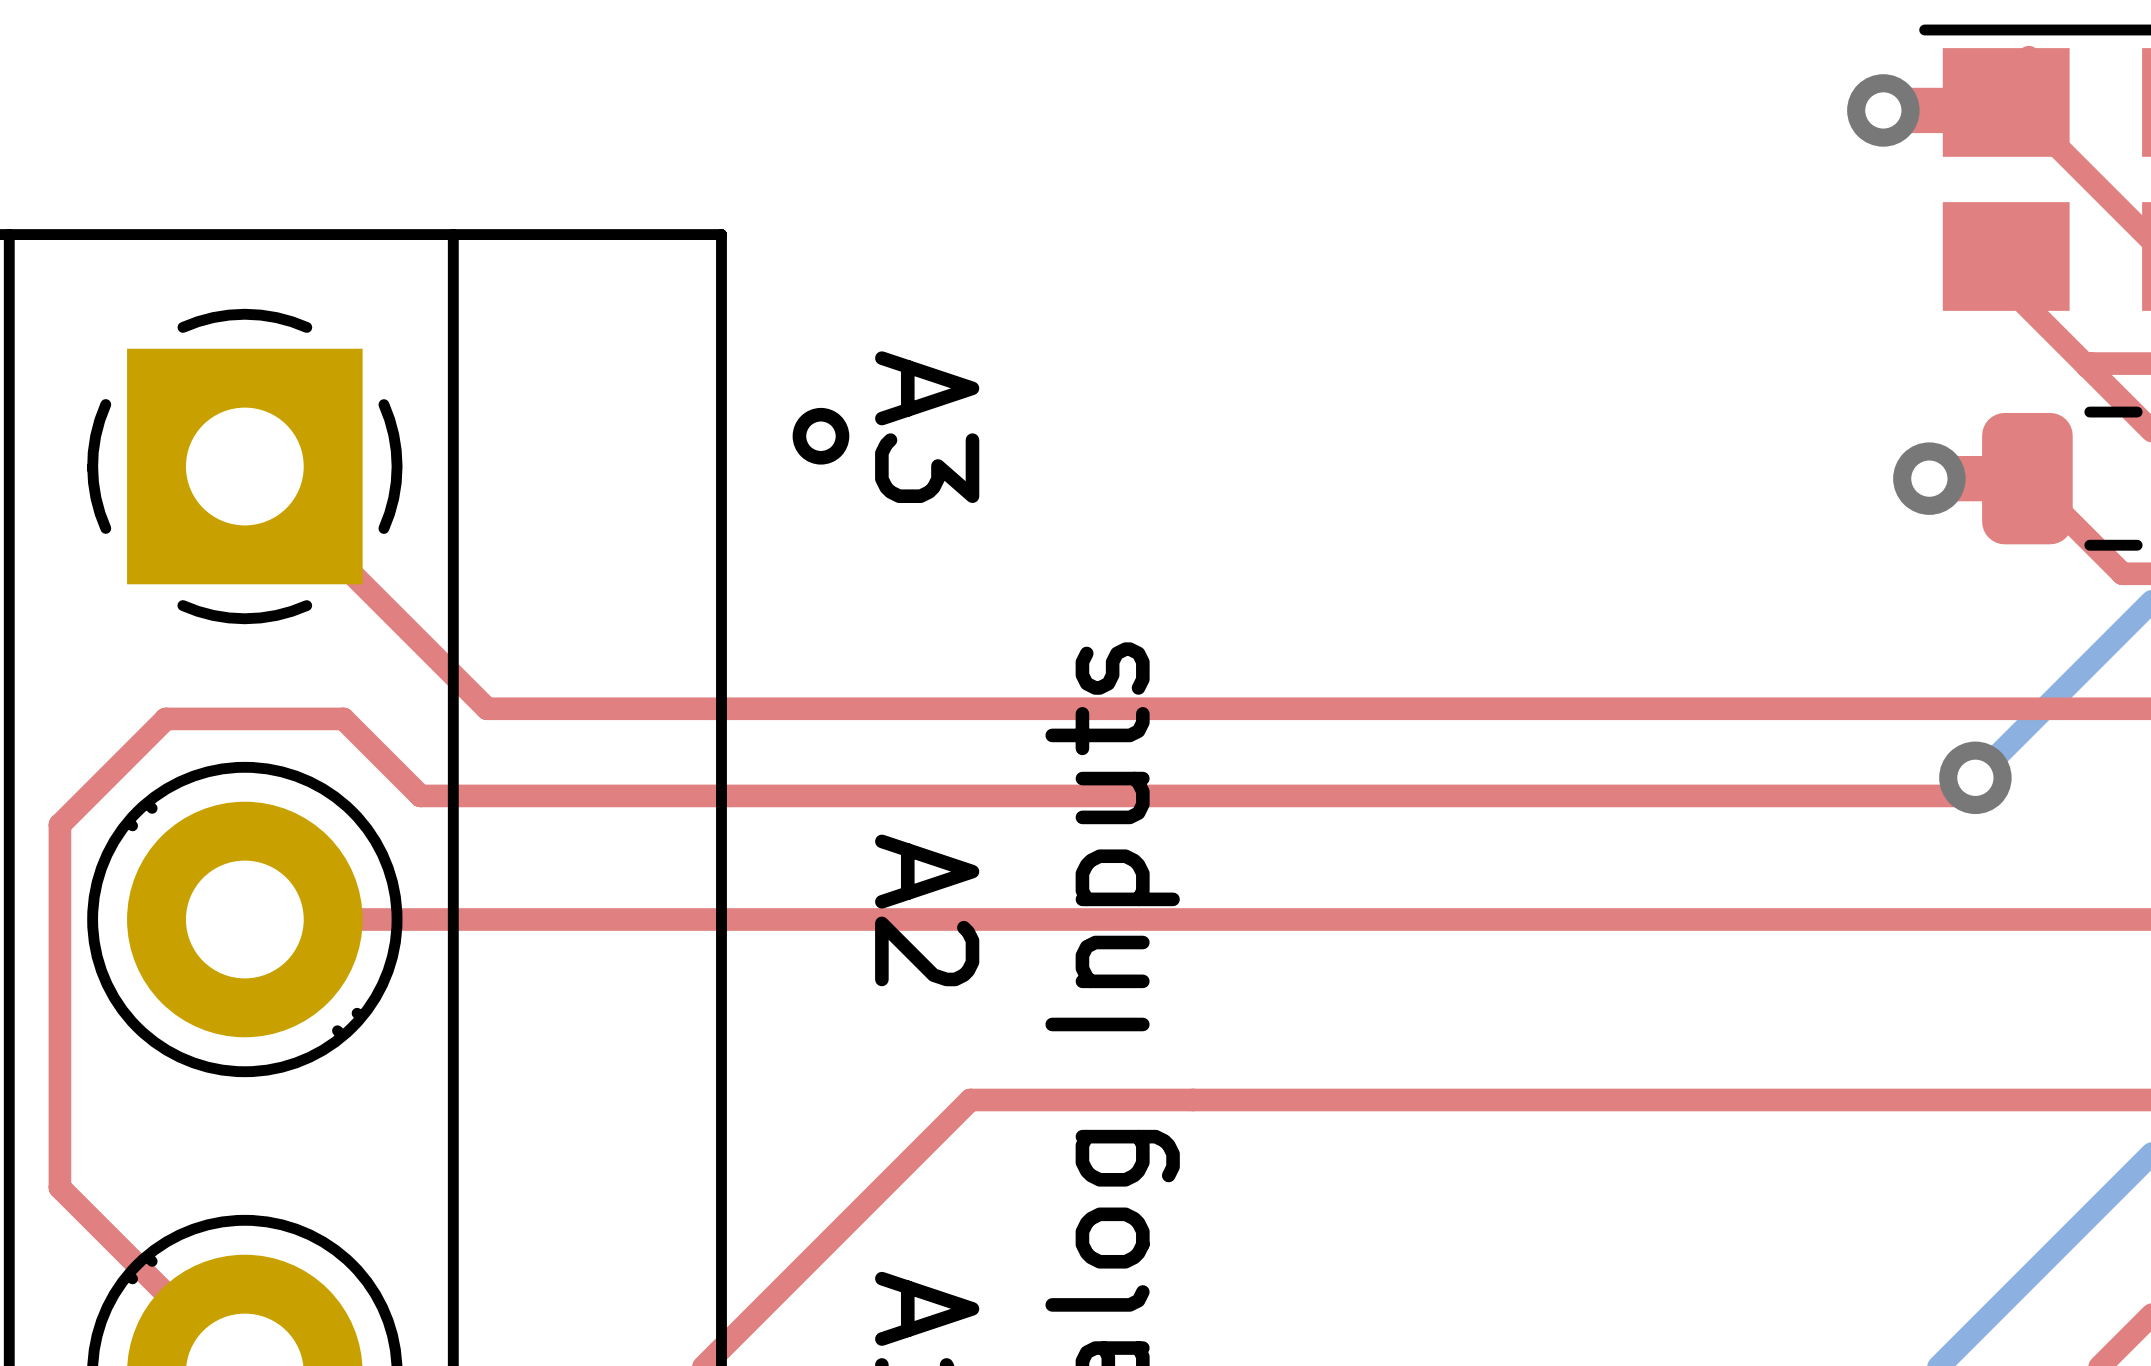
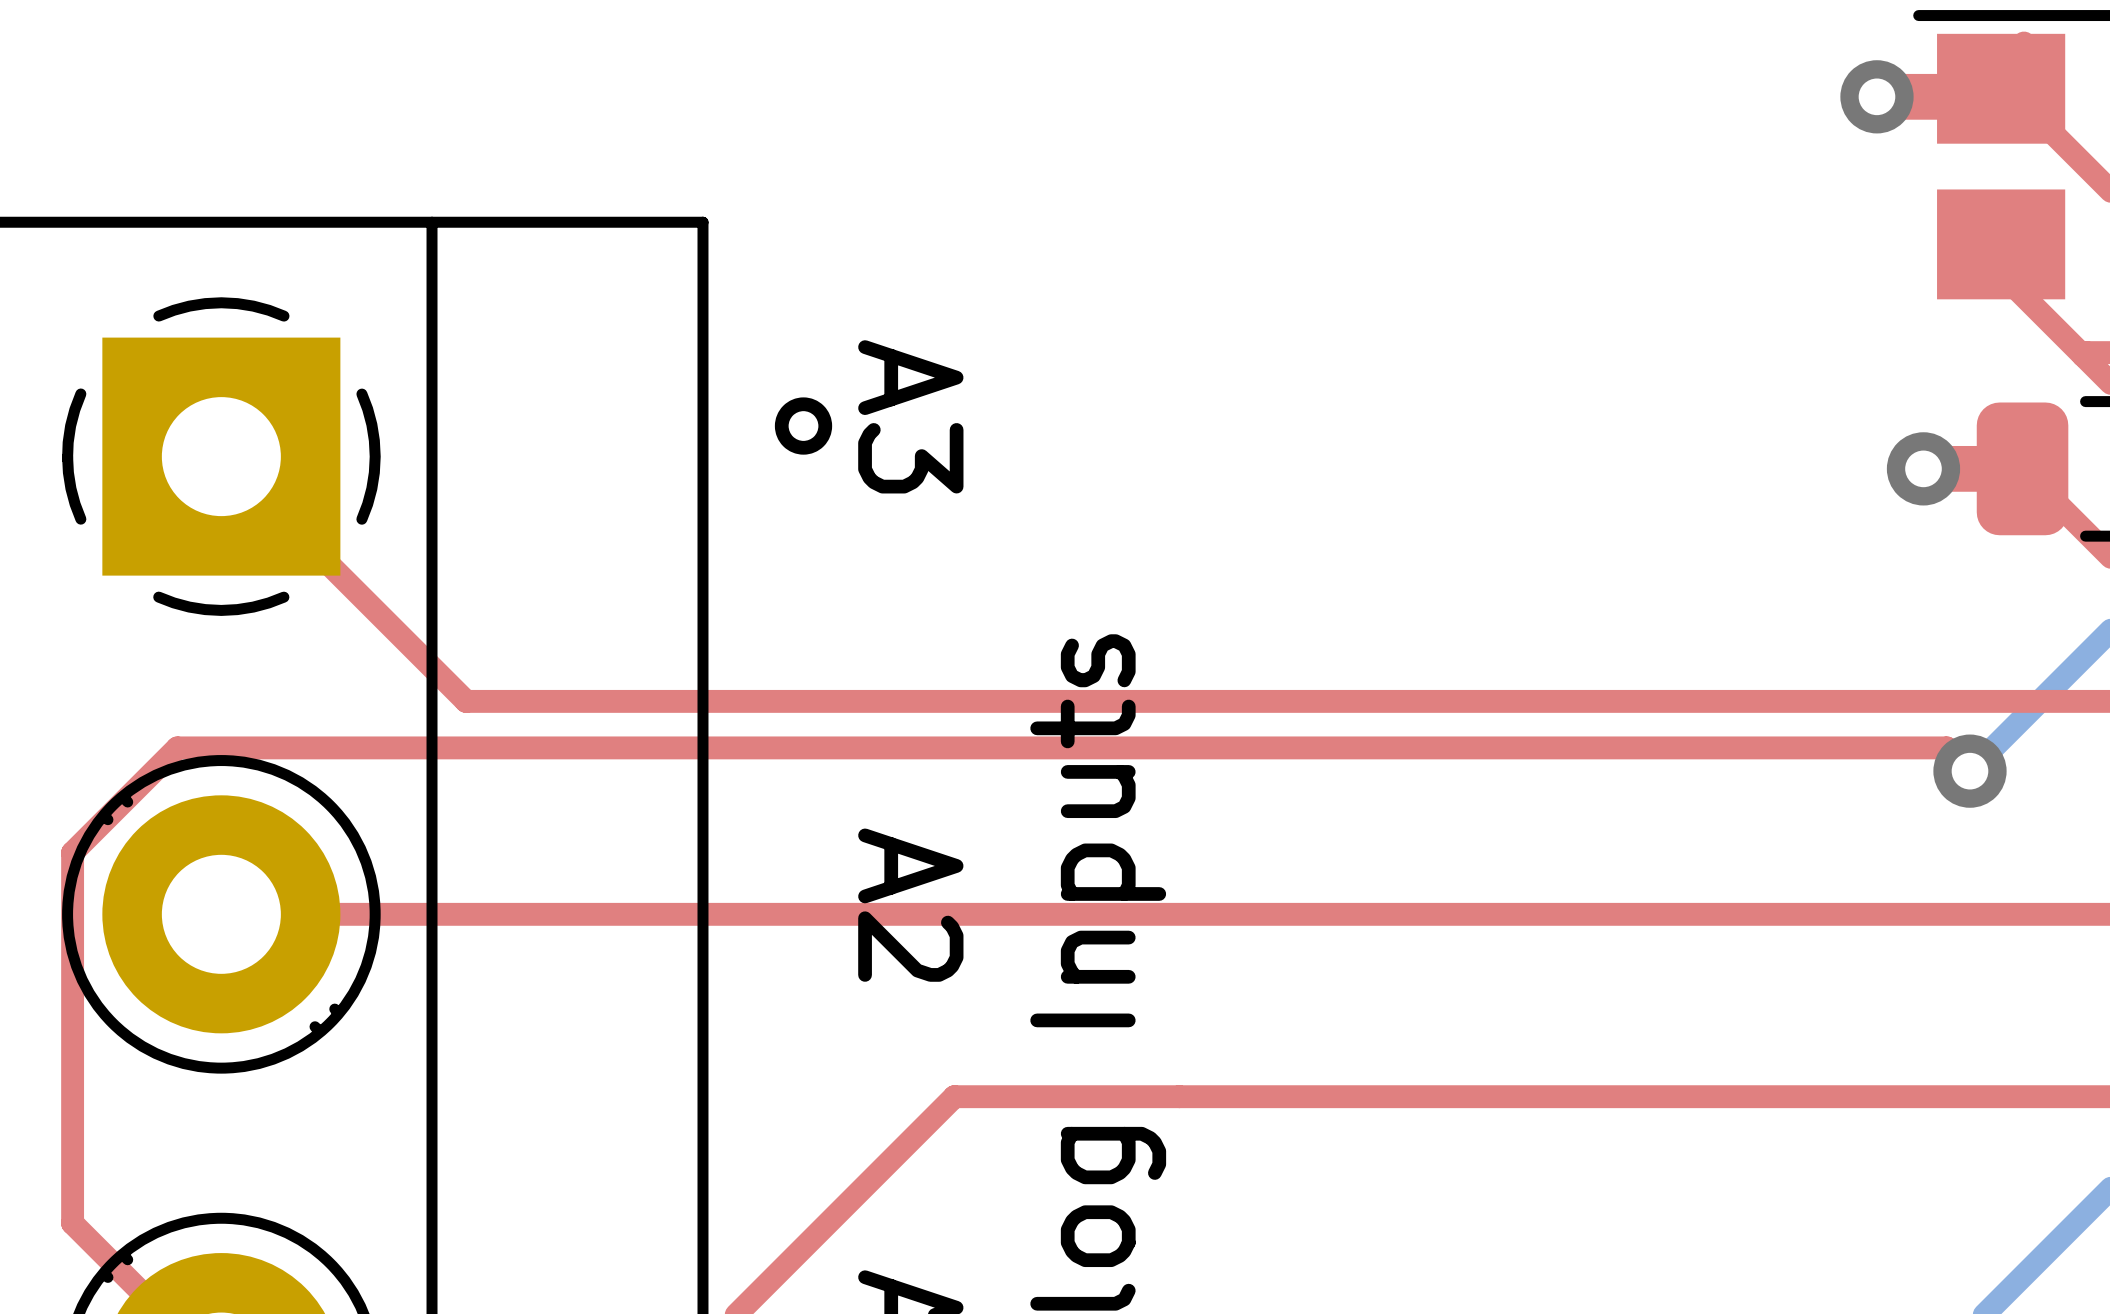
top track: (1975, 777) (1957, 795) (420, 795) (343, 718) (165, 718) (59, 824) (59, 1187) (97, 1225) -> (1969, 771) (1946, 747) (177, 747) (72, 852) (72, 1223)

